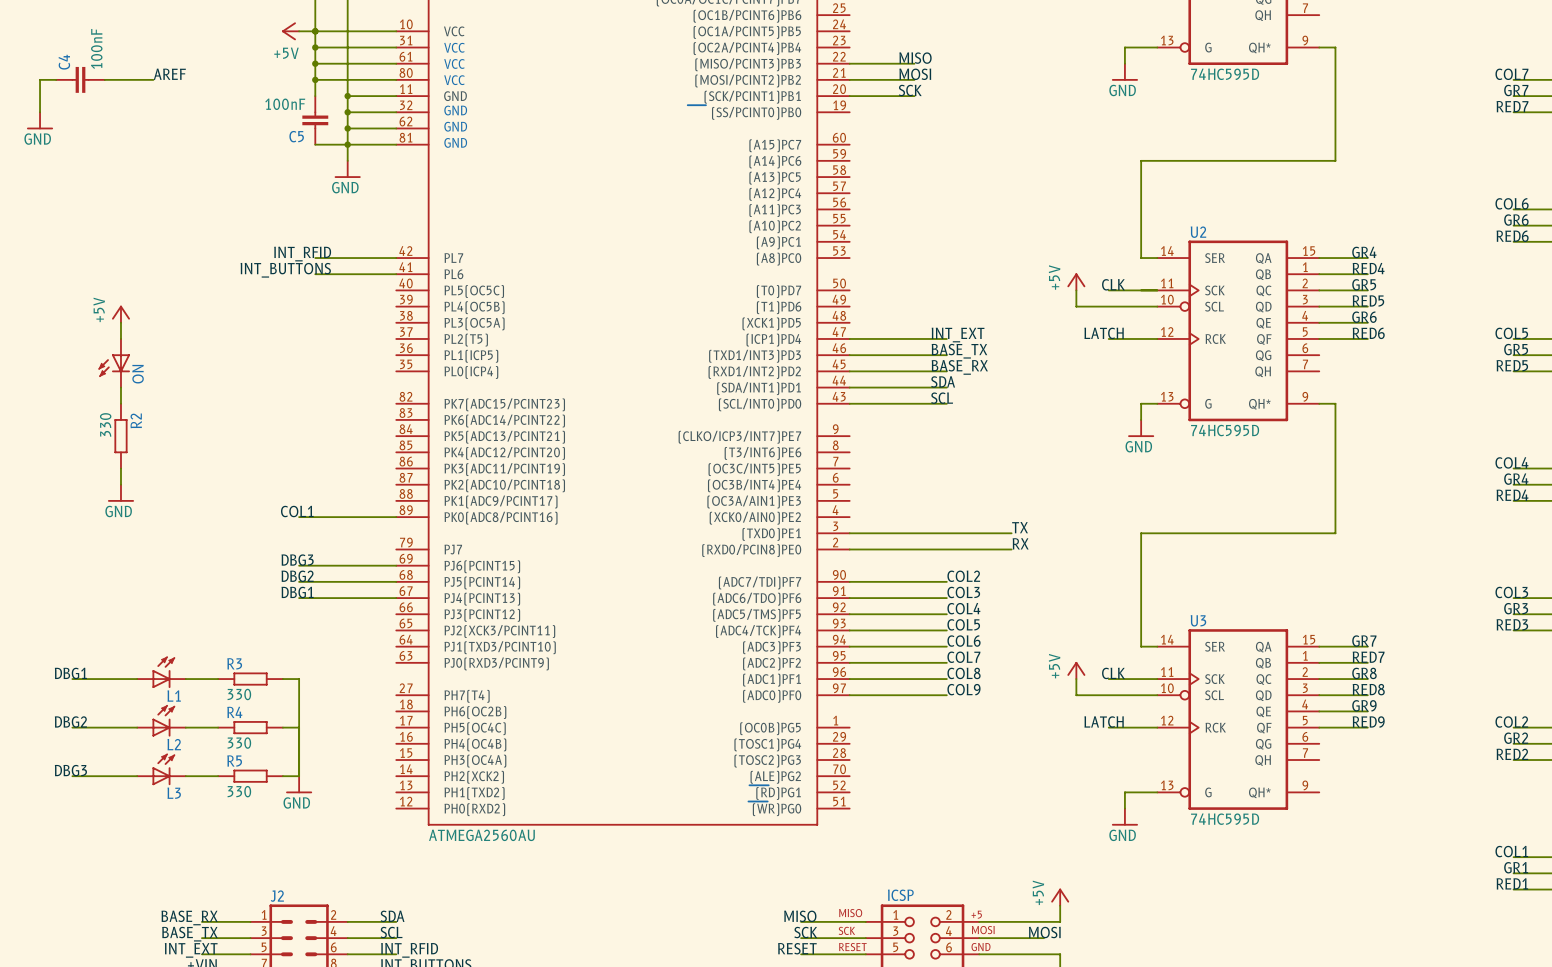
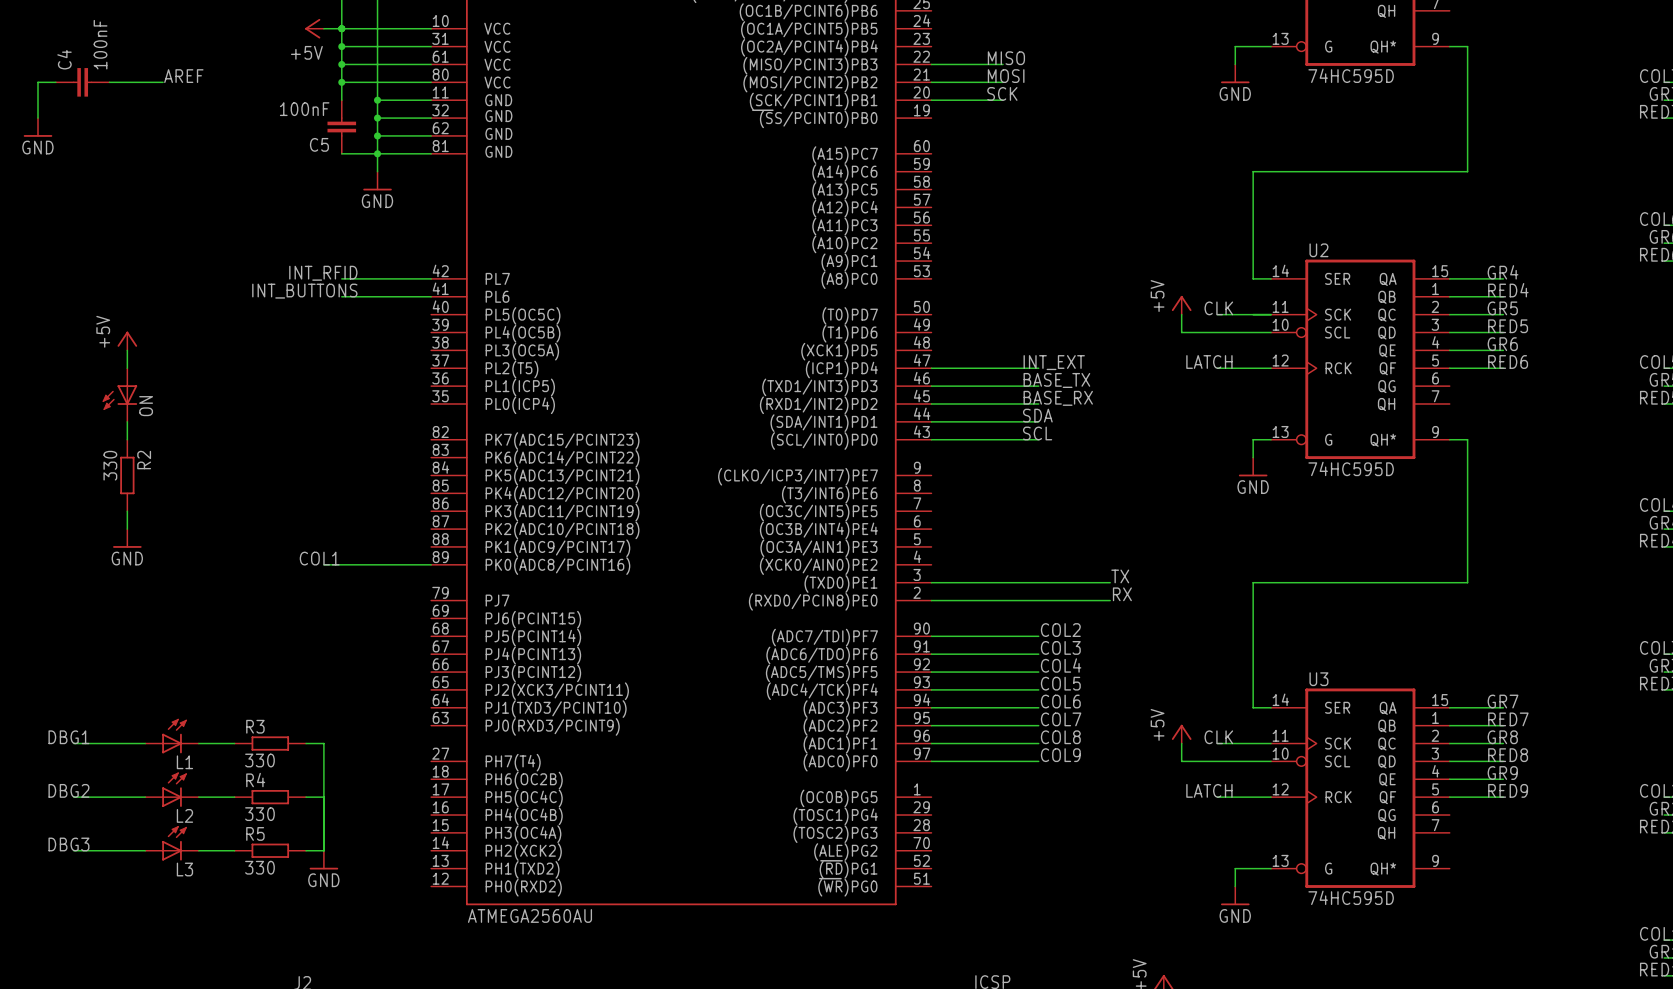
label: DBG3 (297, 560) -> none
wire: (299, 565) (396, 565) -> none
label: DBG2 (297, 576) -> none
wire: (299, 581) (396, 581) -> none
label: DBG1 (297, 592) -> none
wire: (299, 598) (396, 598) -> none

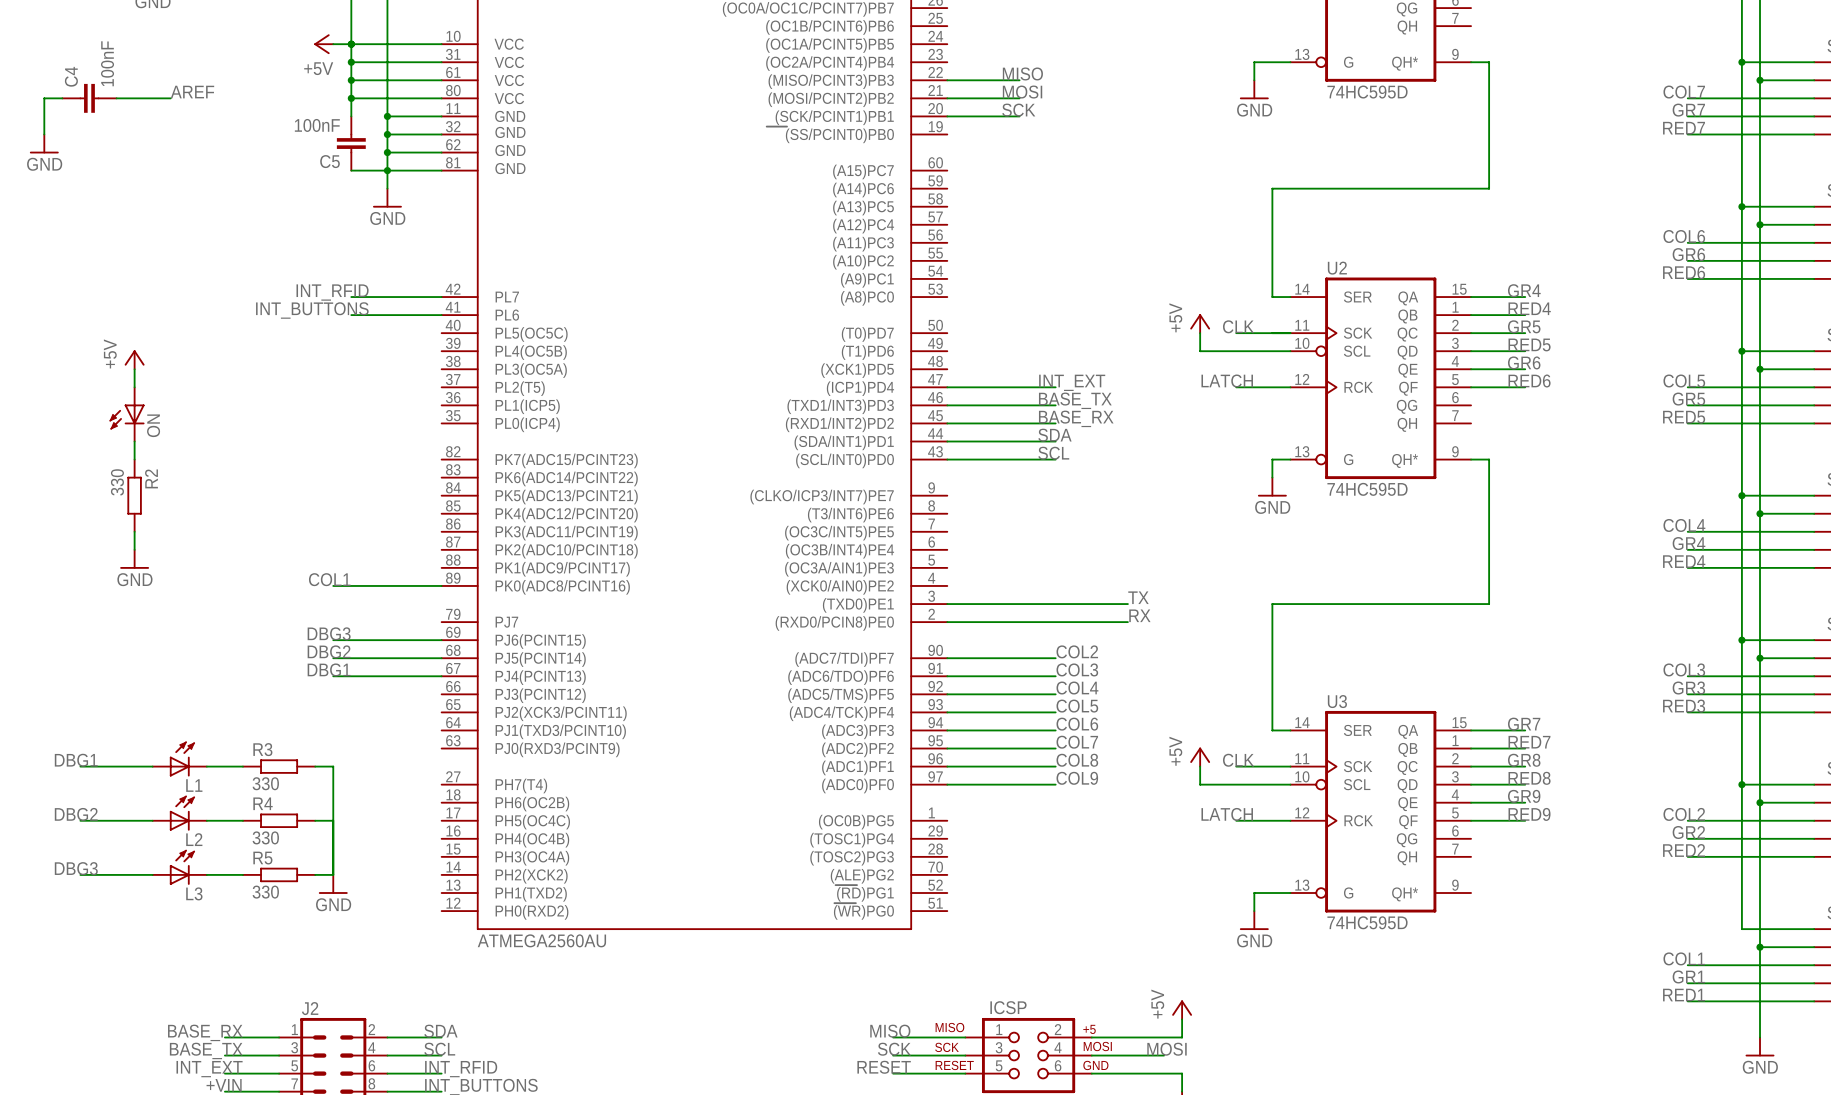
label: none -> DBG3 (329, 633)
wire: none -> (333, 640) (441, 640)
label: none -> DBG2 (329, 651)
wire: none -> (333, 658) (441, 658)
label: none -> DBG1 (329, 669)
wire: none -> (333, 676) (441, 676)

